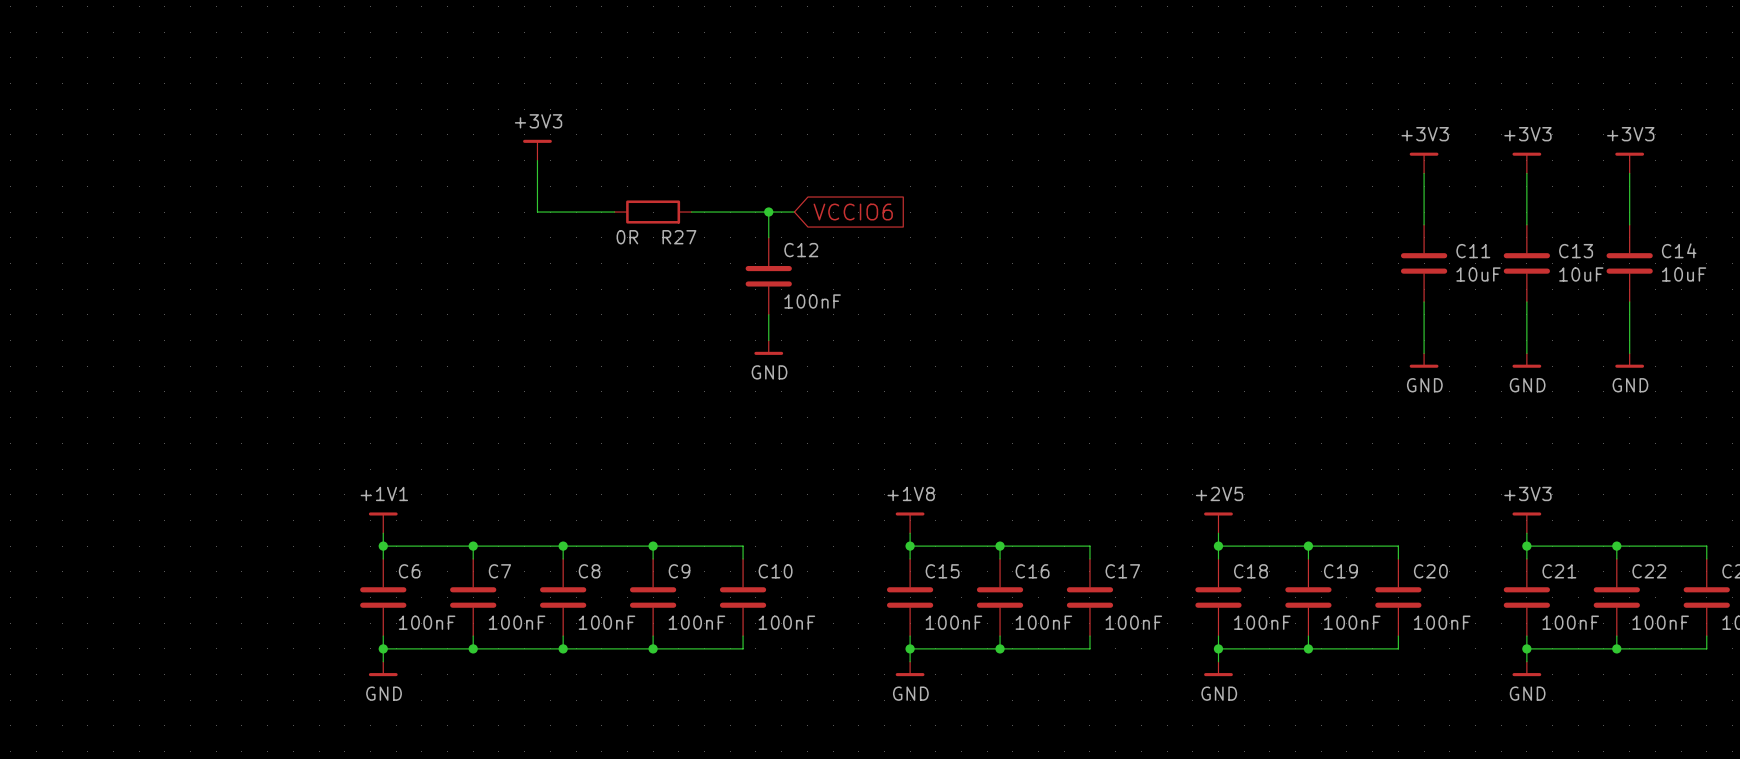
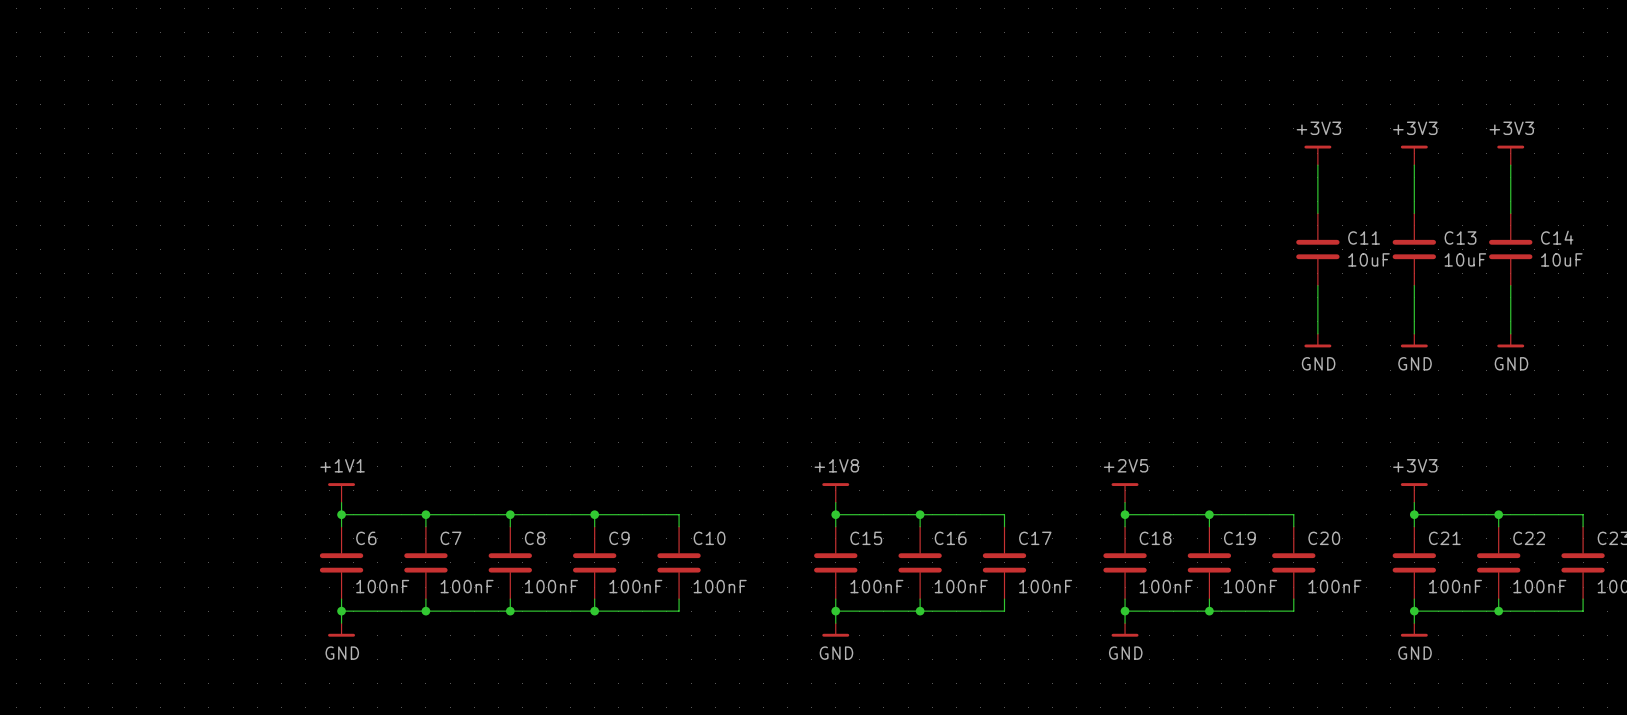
power symbol: +3V3 (537, 150) -> none
wire: (537, 160) (537, 212) (614, 212) -> none
R27: 0R (653, 212) -> none
wire: (691, 212) (794, 212) -> none
wire: (768, 212) (768, 237) -> none
junction: (768, 212) -> none
global label: VCCIO6 (853, 212) -> none
C12: 100nF (768, 276) -> none
wire: (768, 314) (768, 340) -> none
power symbol: GND (768, 347) -> none

